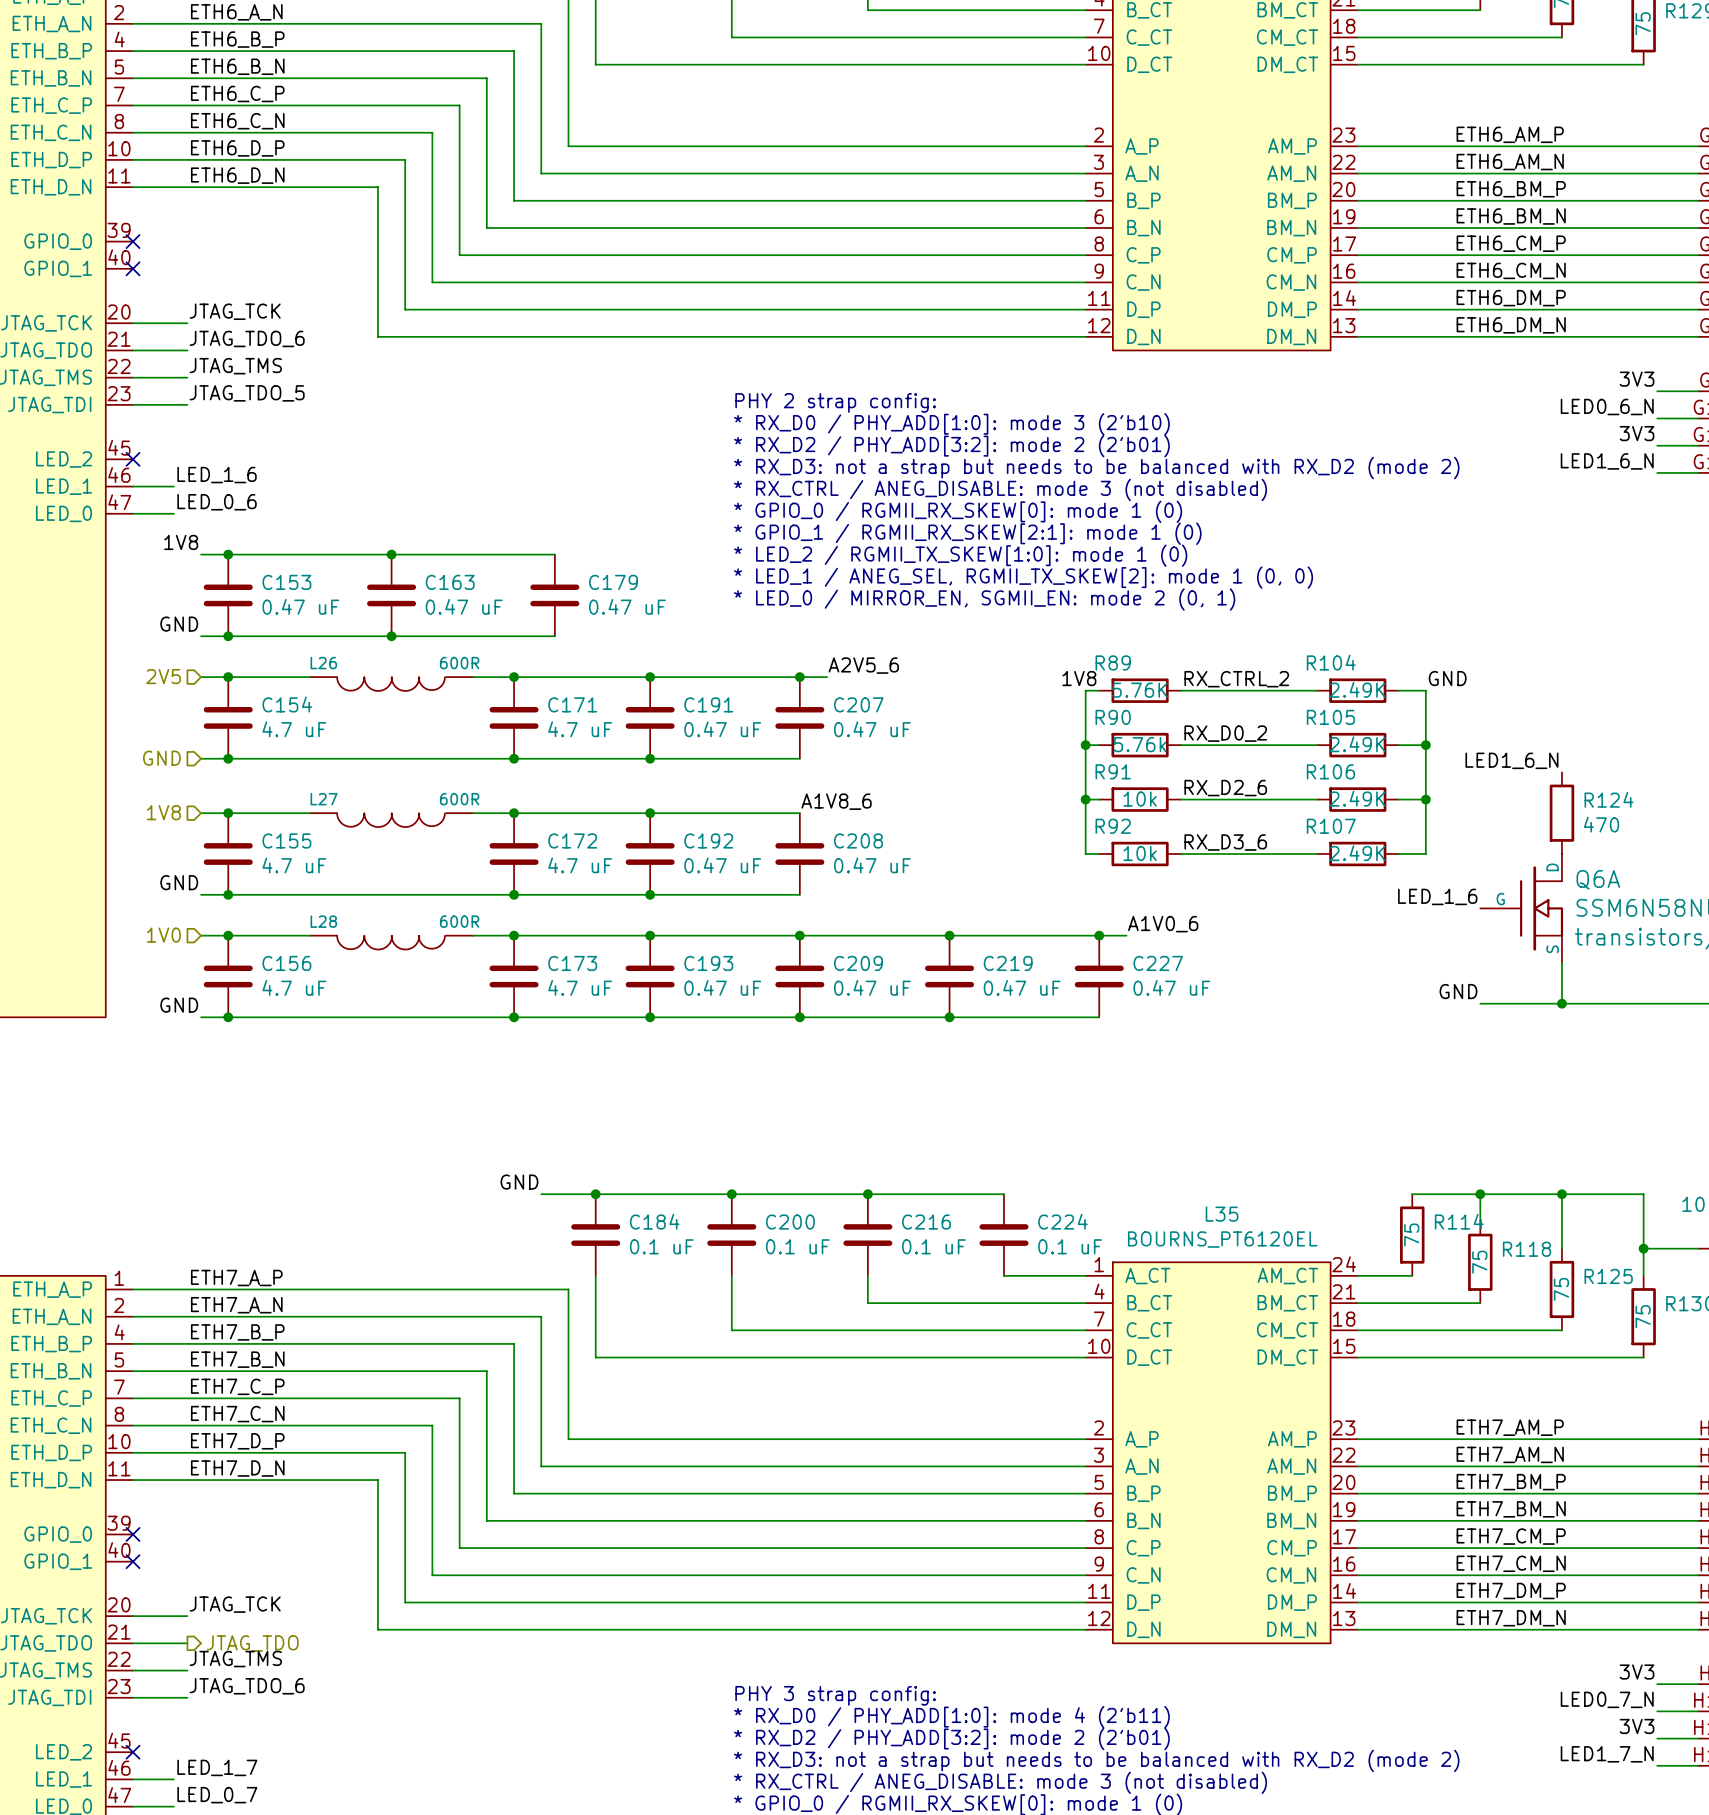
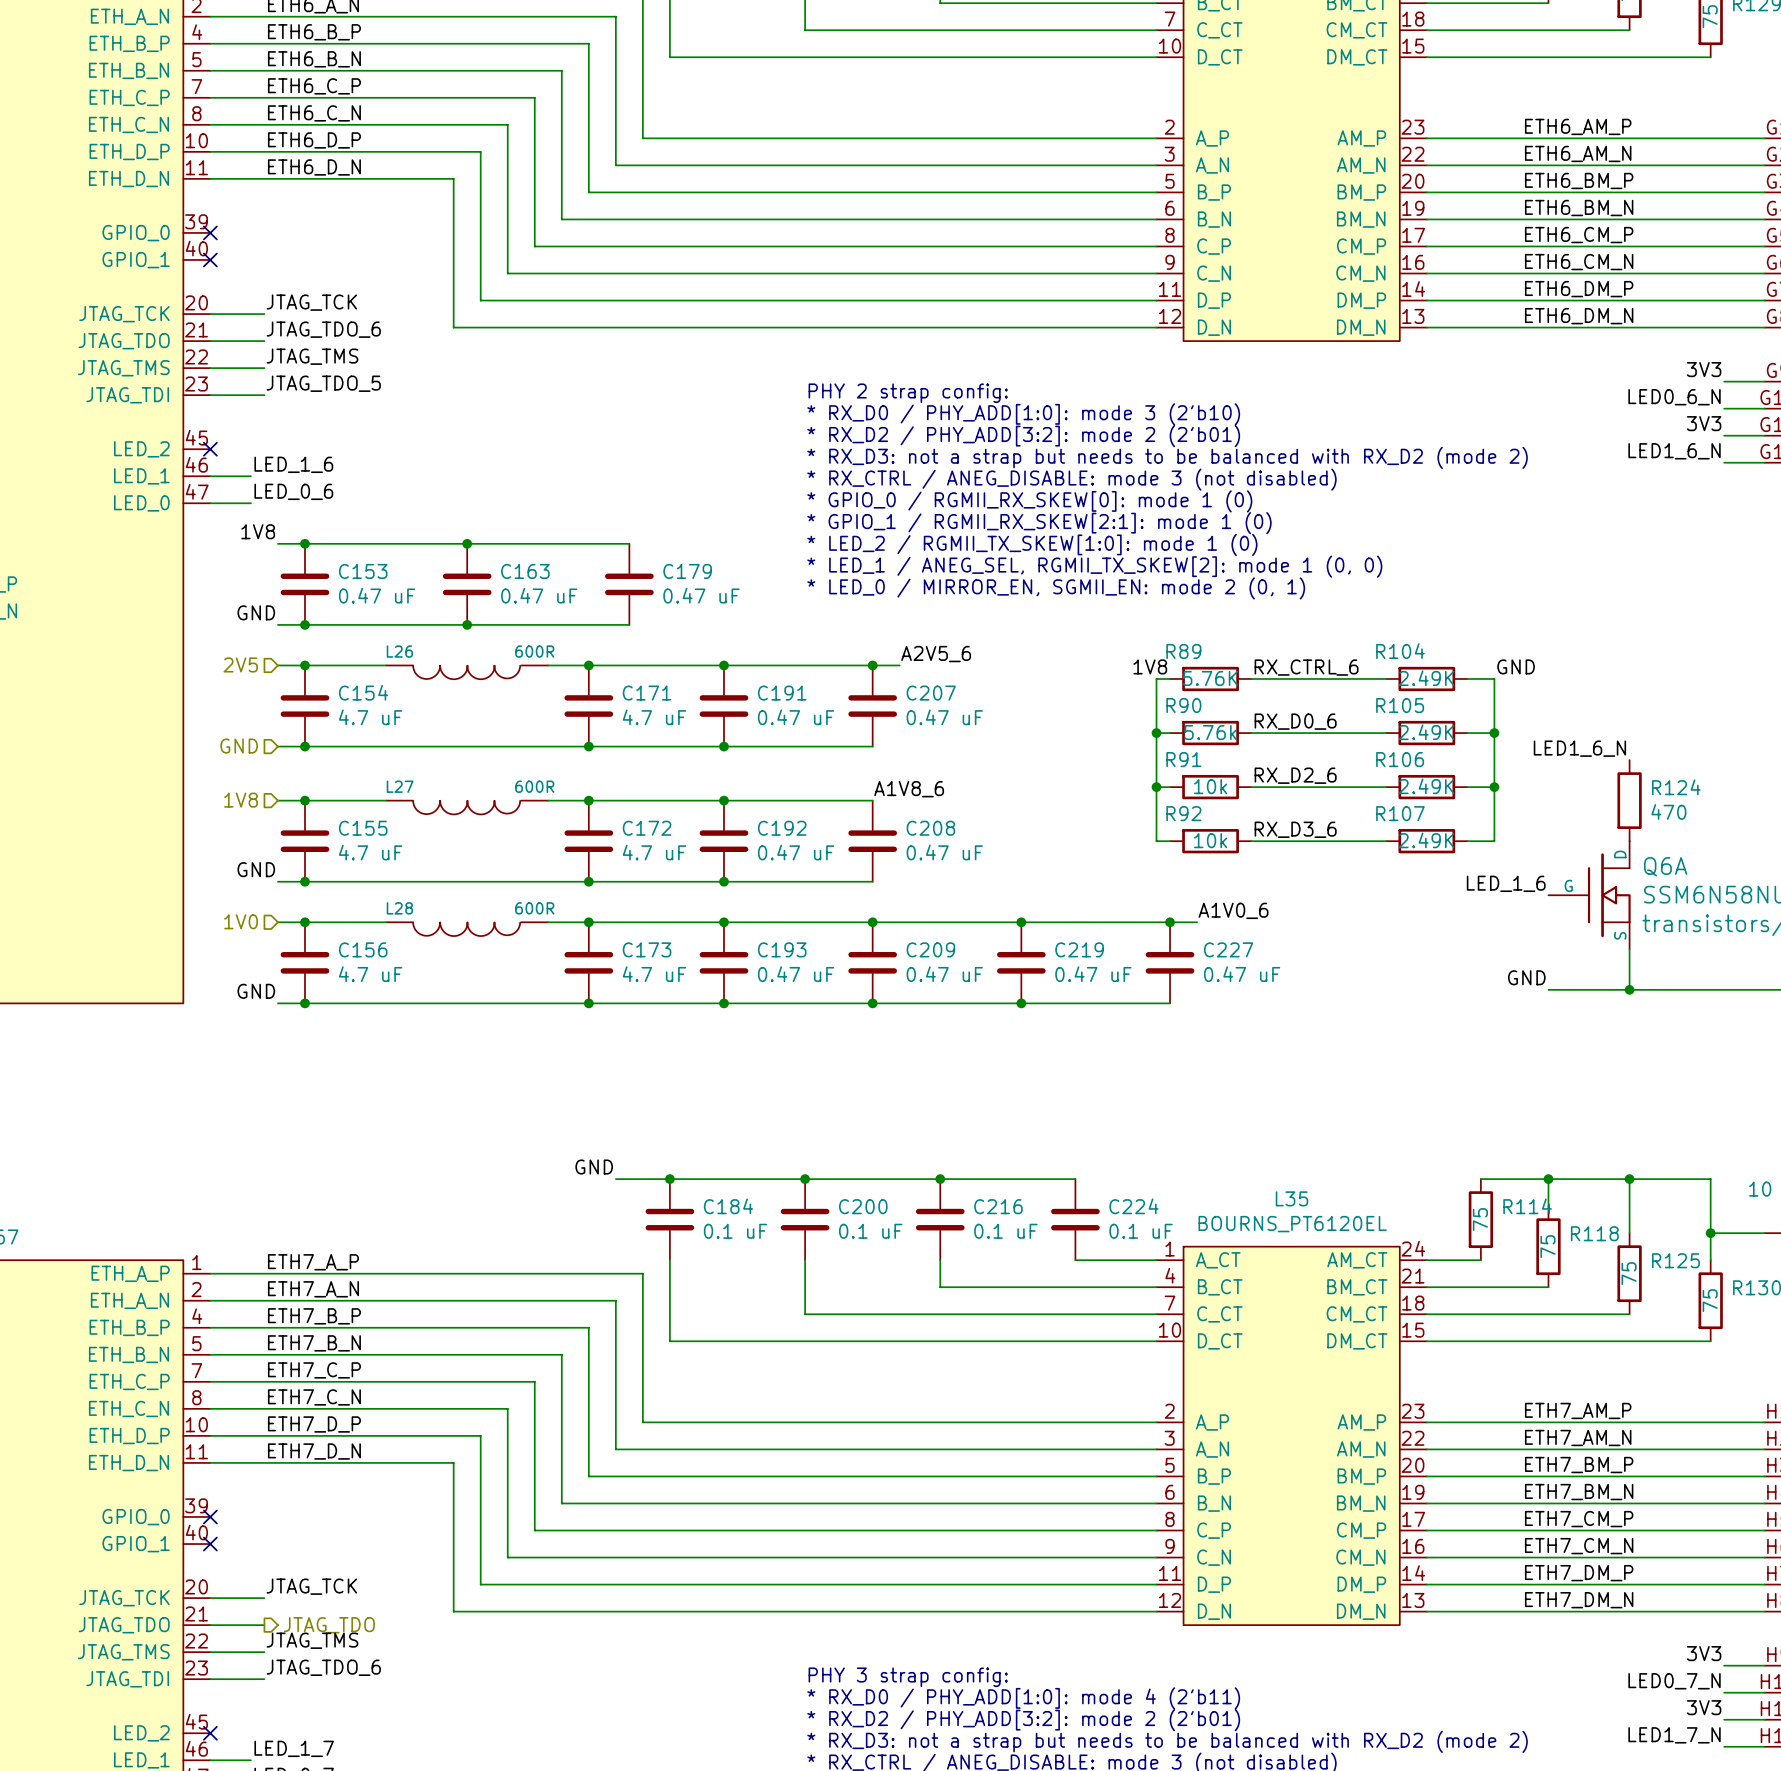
label: RX_CTRL_2 (1236, 679) -> RX_CTRL_6 (1306, 667)
label: RX_D0_2 (1225, 733) -> RX_D0_6 (1295, 721)

